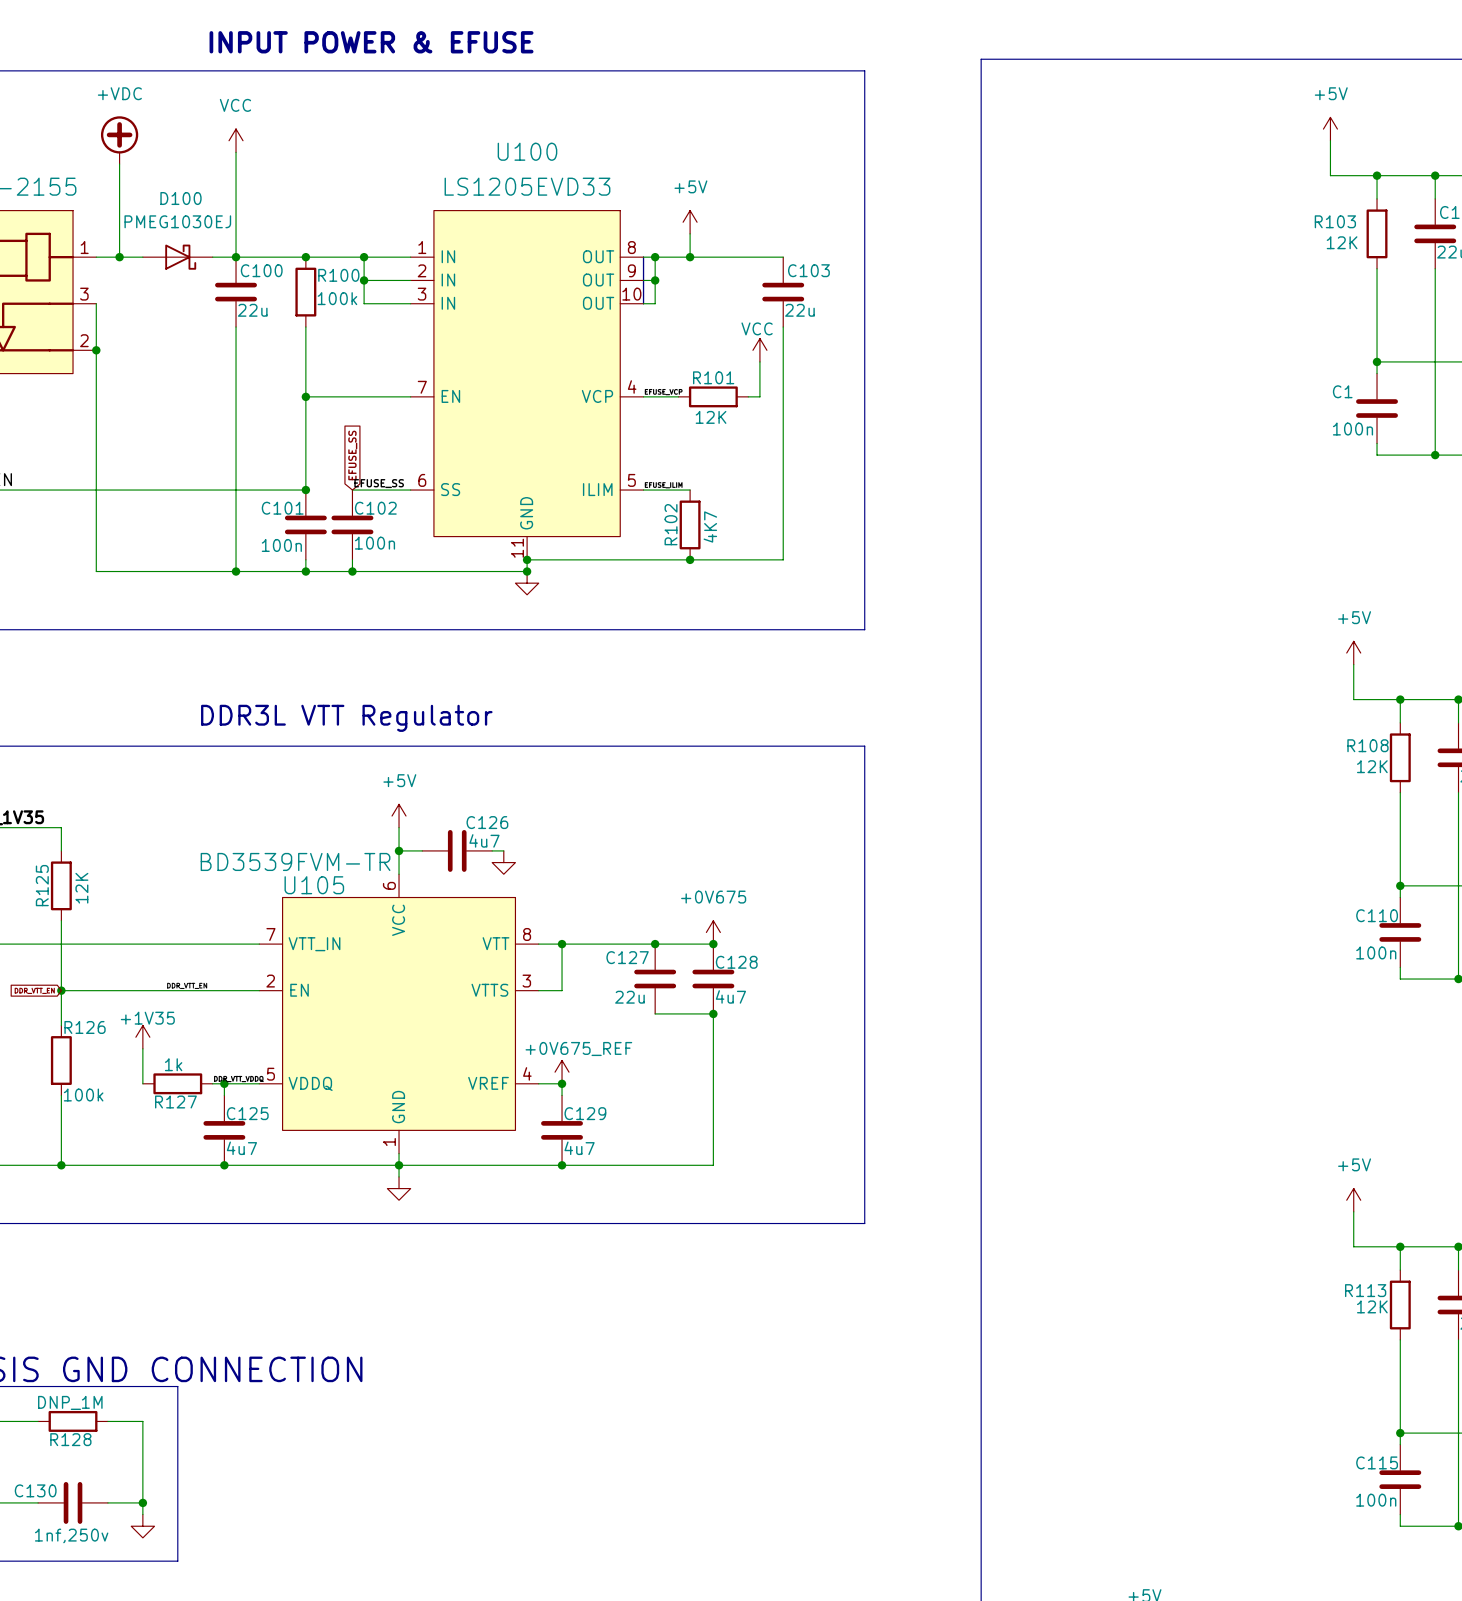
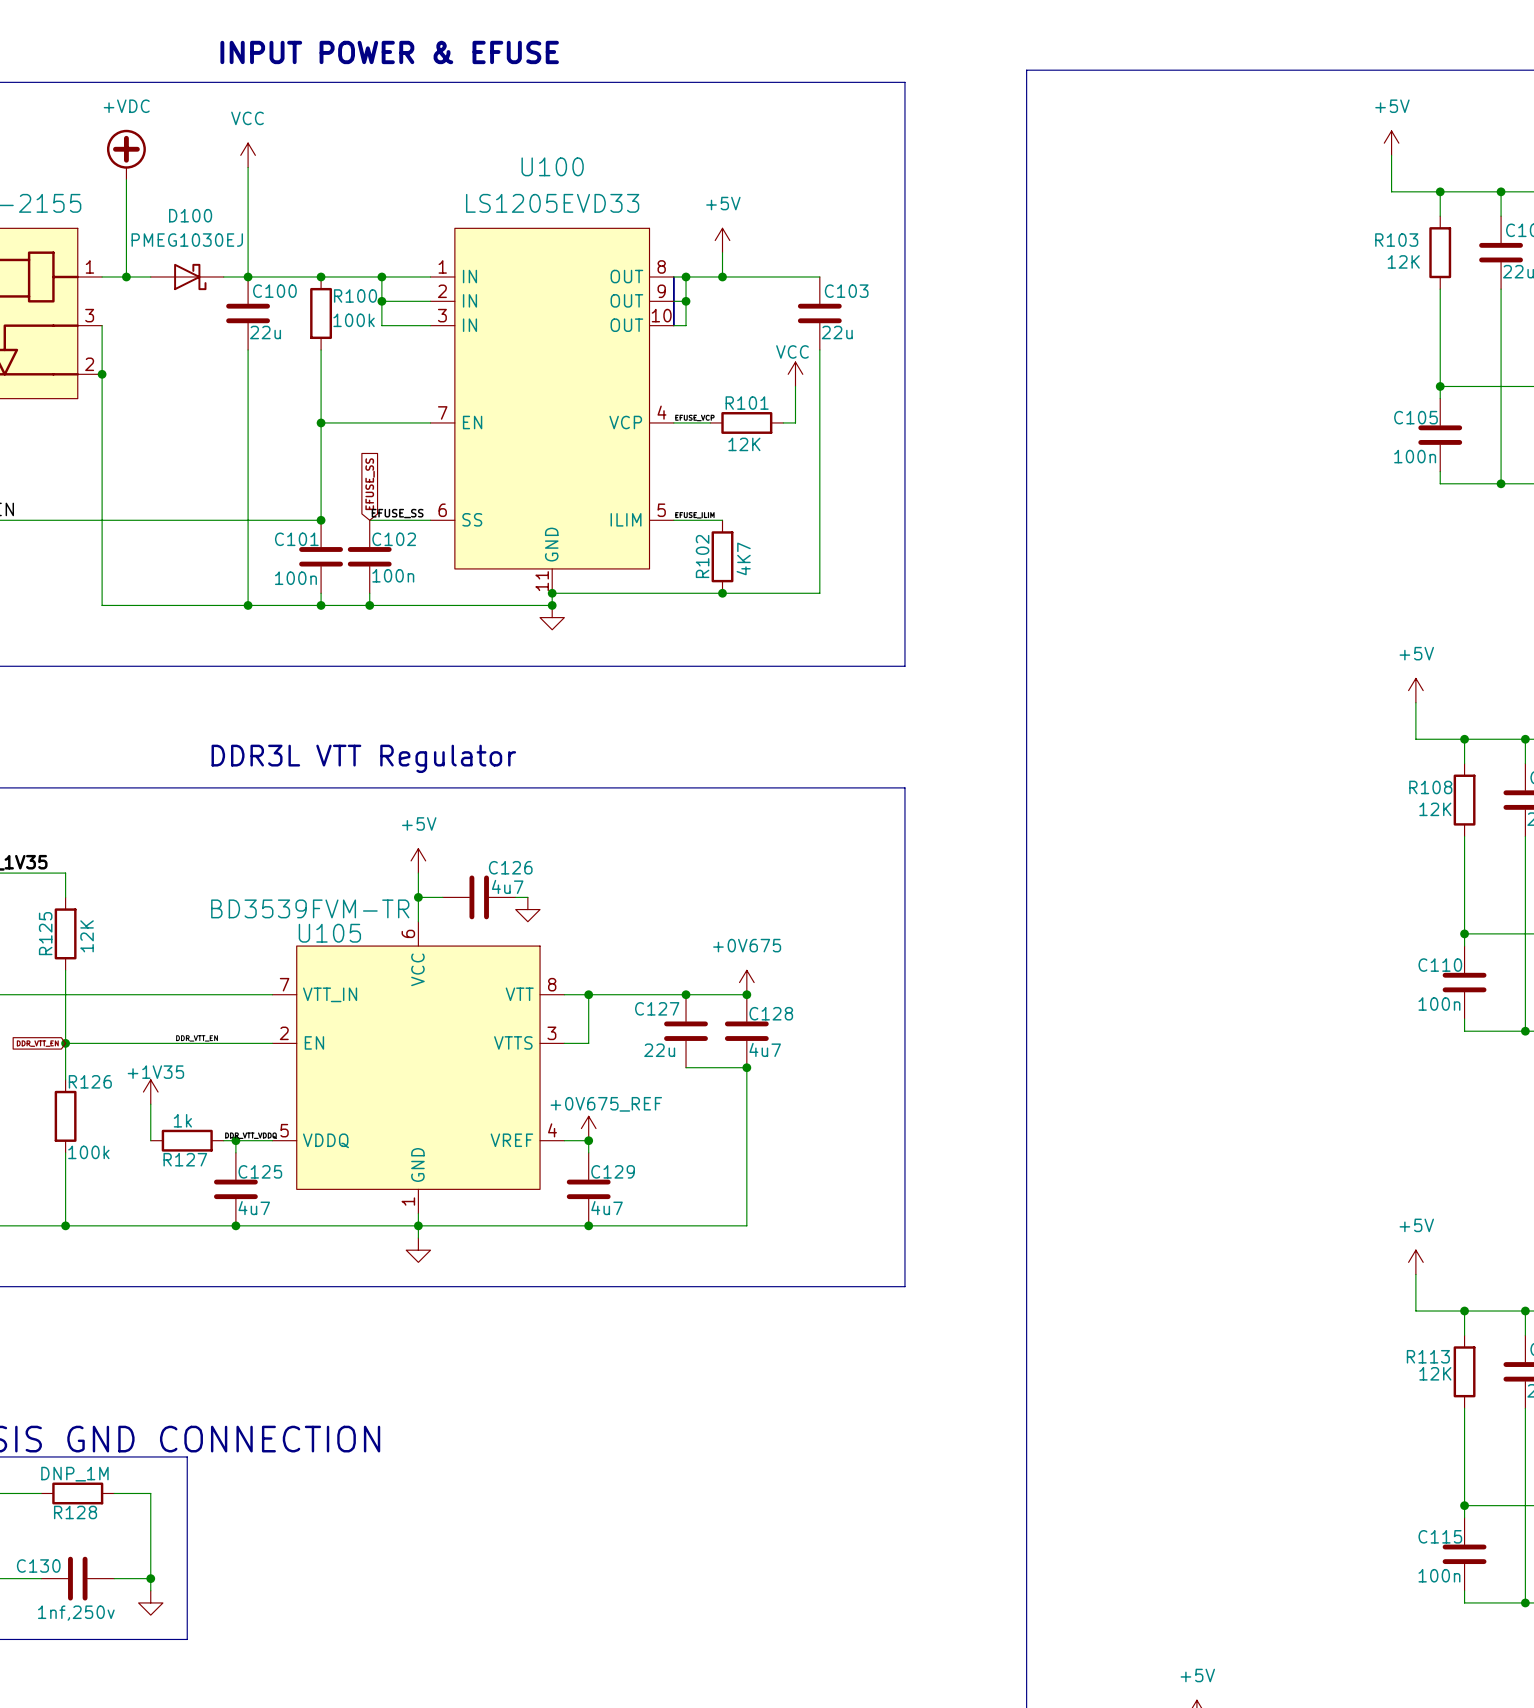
C1 name: C1 (1342, 391) -> C105 (1415, 417)

